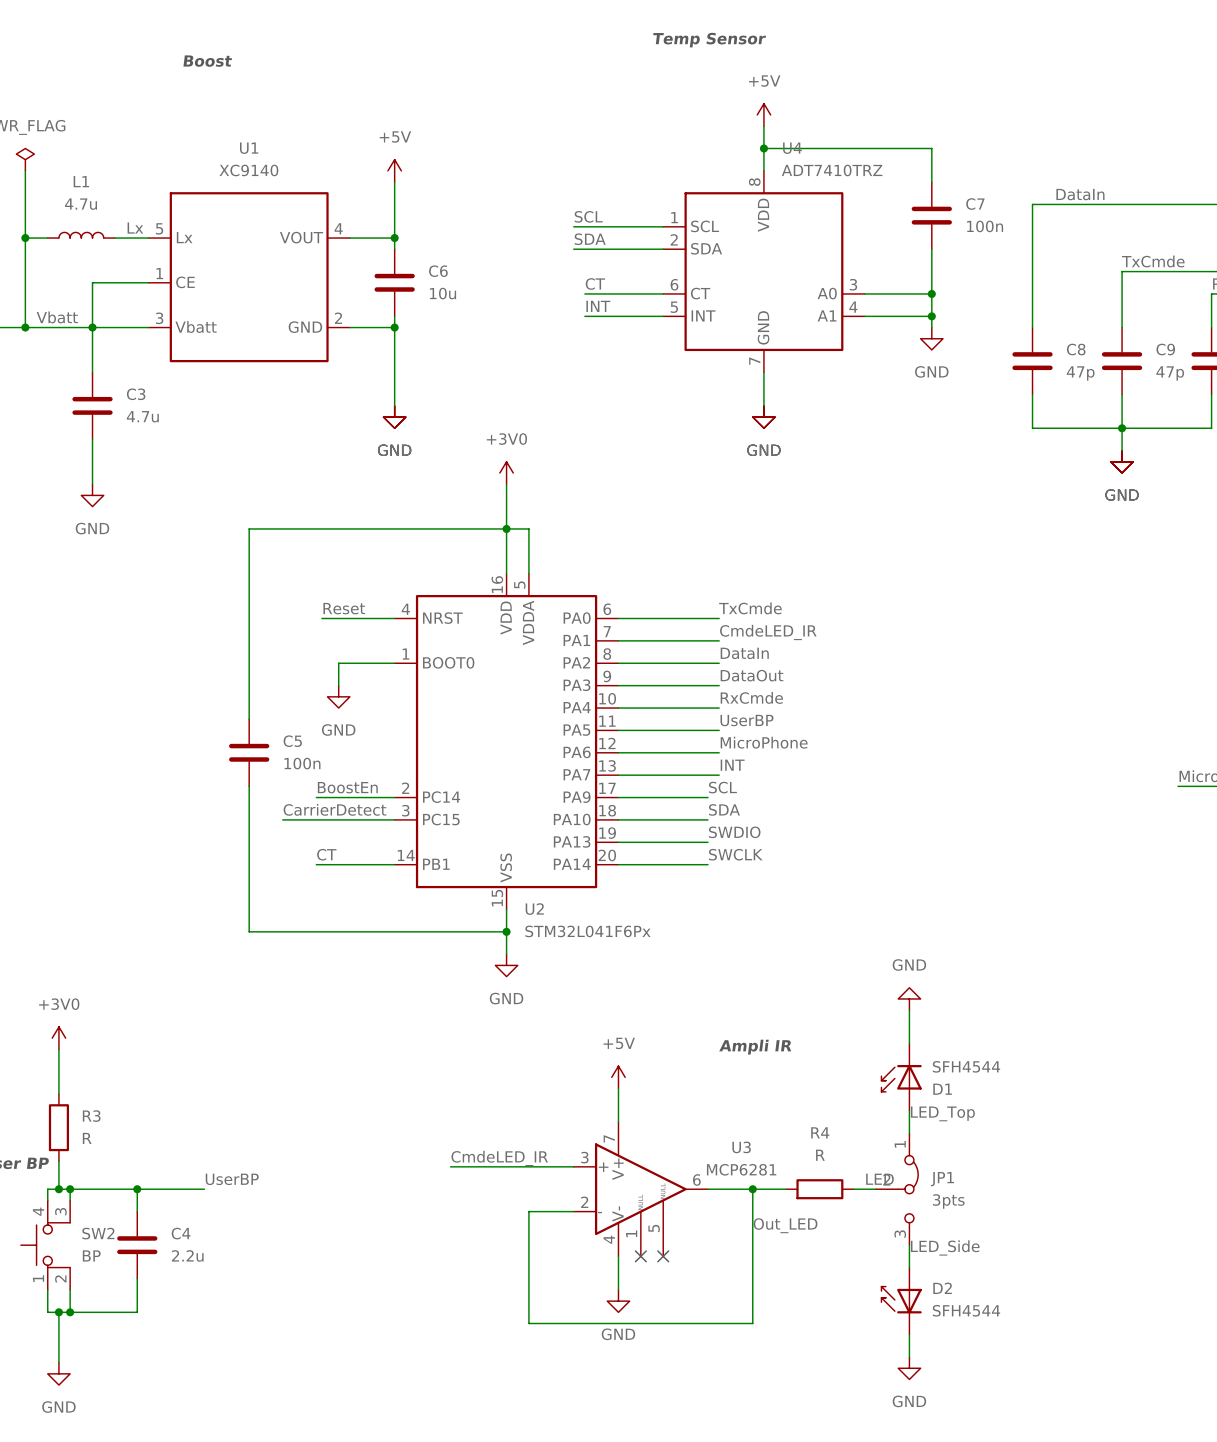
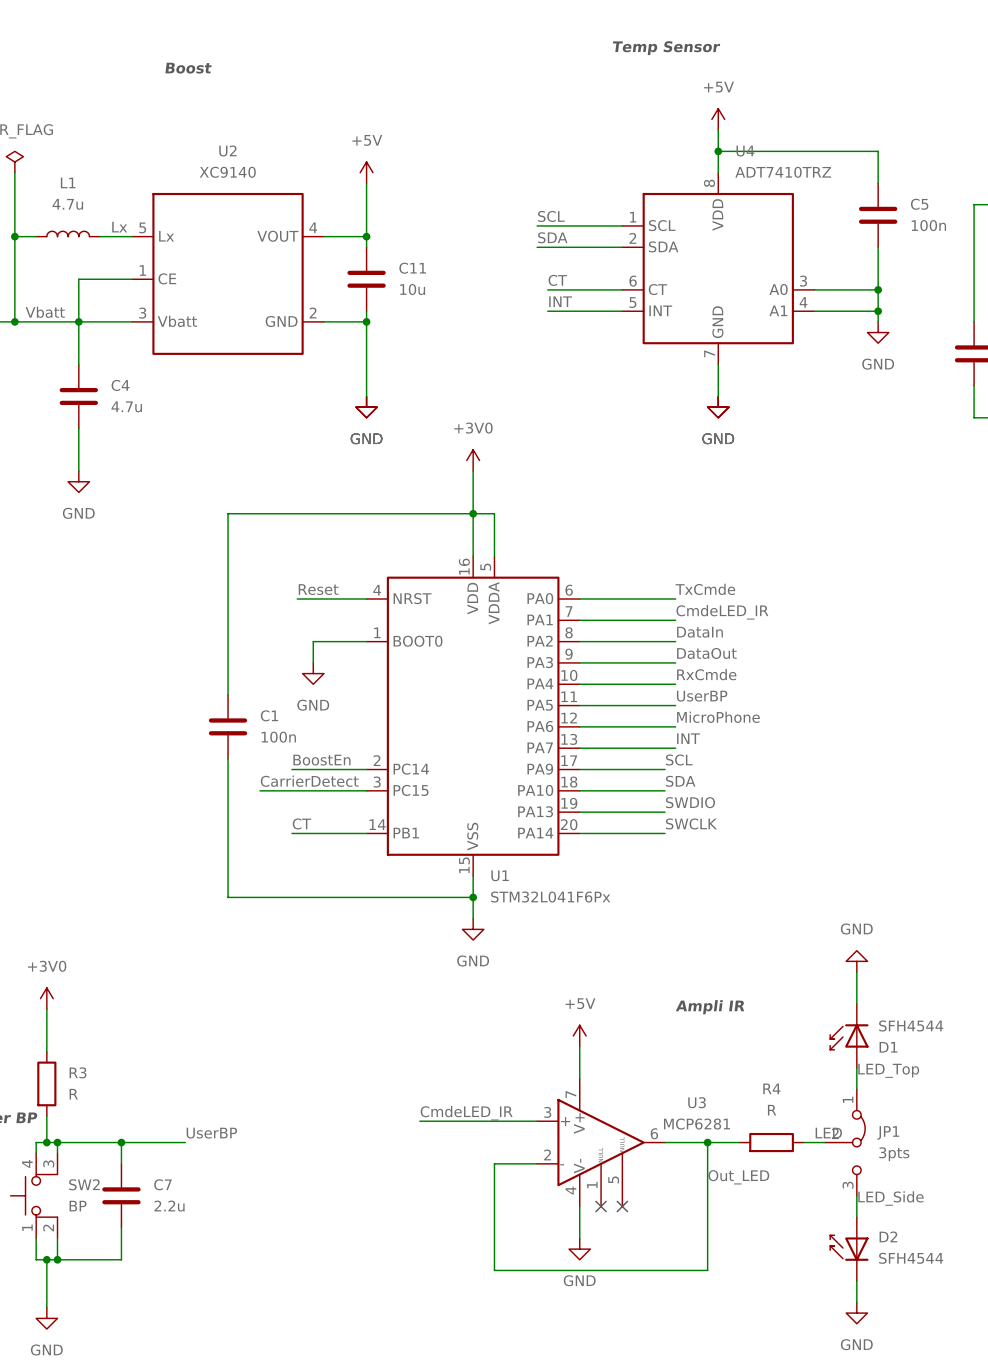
U1 name: U1 (249, 148) -> U2 (227, 150)
C7 name: C7 (975, 204) -> C5 (919, 204)
C6 name: C6 (438, 271) -> C11 (412, 268)
C3 name: C3 (136, 394) -> C4 (120, 385)
C5 name: C5 (292, 741) -> C1 (269, 715)
U2 name: U2 (534, 909) -> U1 (500, 875)
C4 name: C4 (181, 1233) -> C7 (162, 1184)

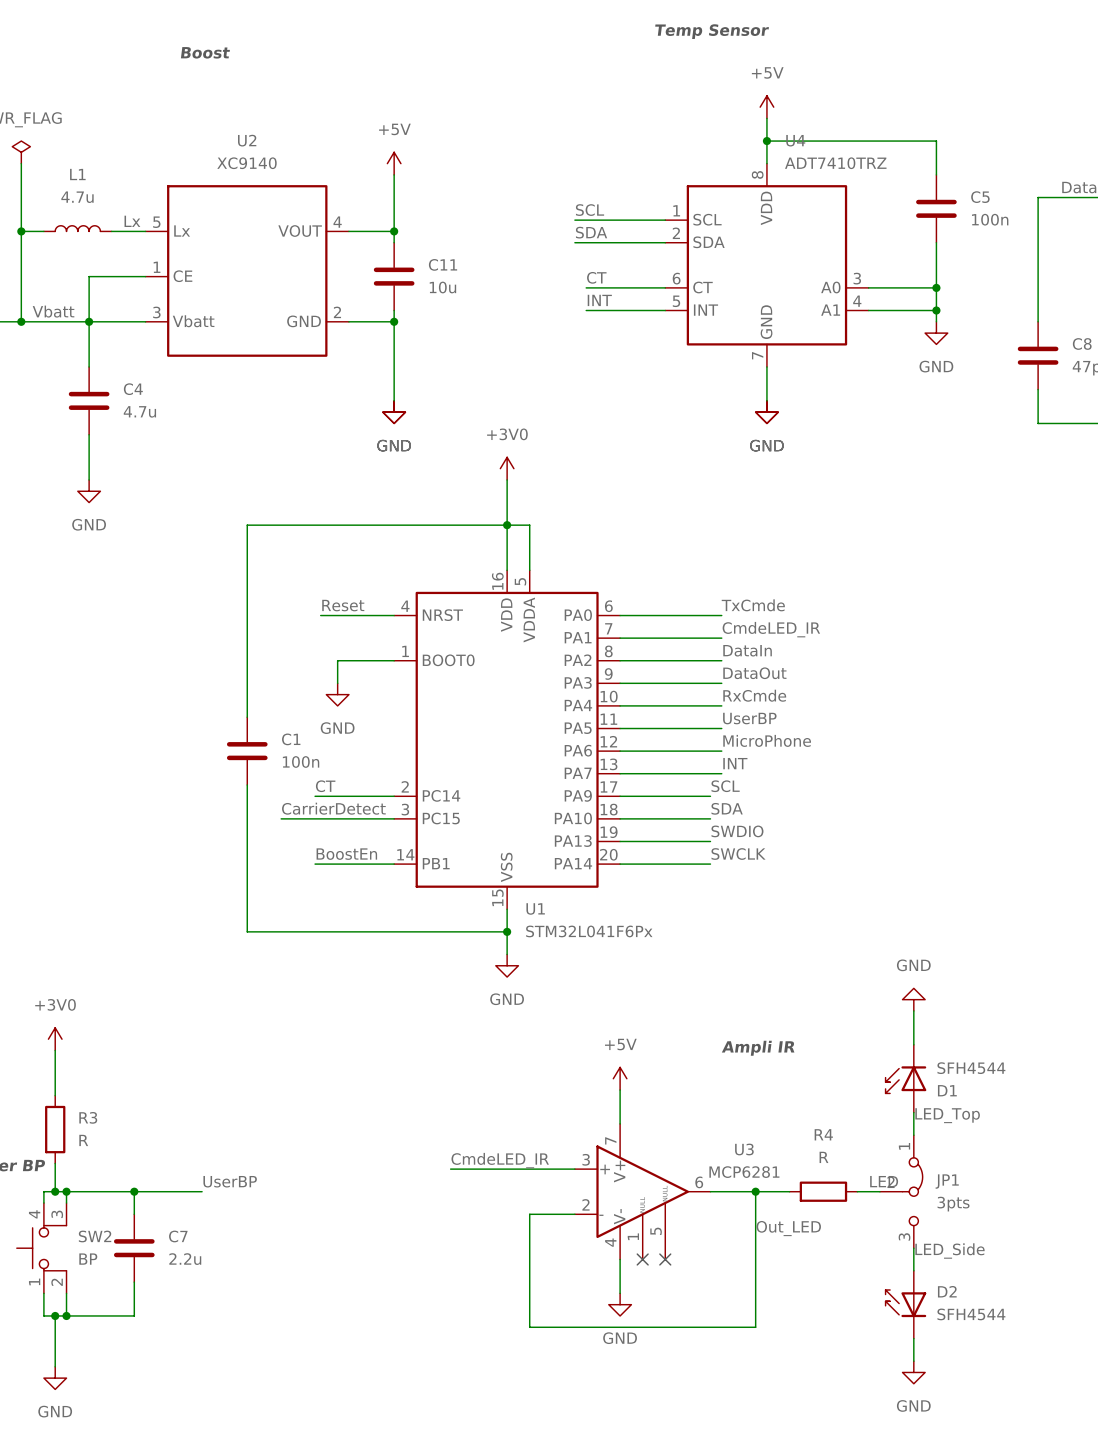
label: BoostEn (321, 760) -> CT (325, 786)
label: CT (301, 823) -> BoostEn (346, 854)

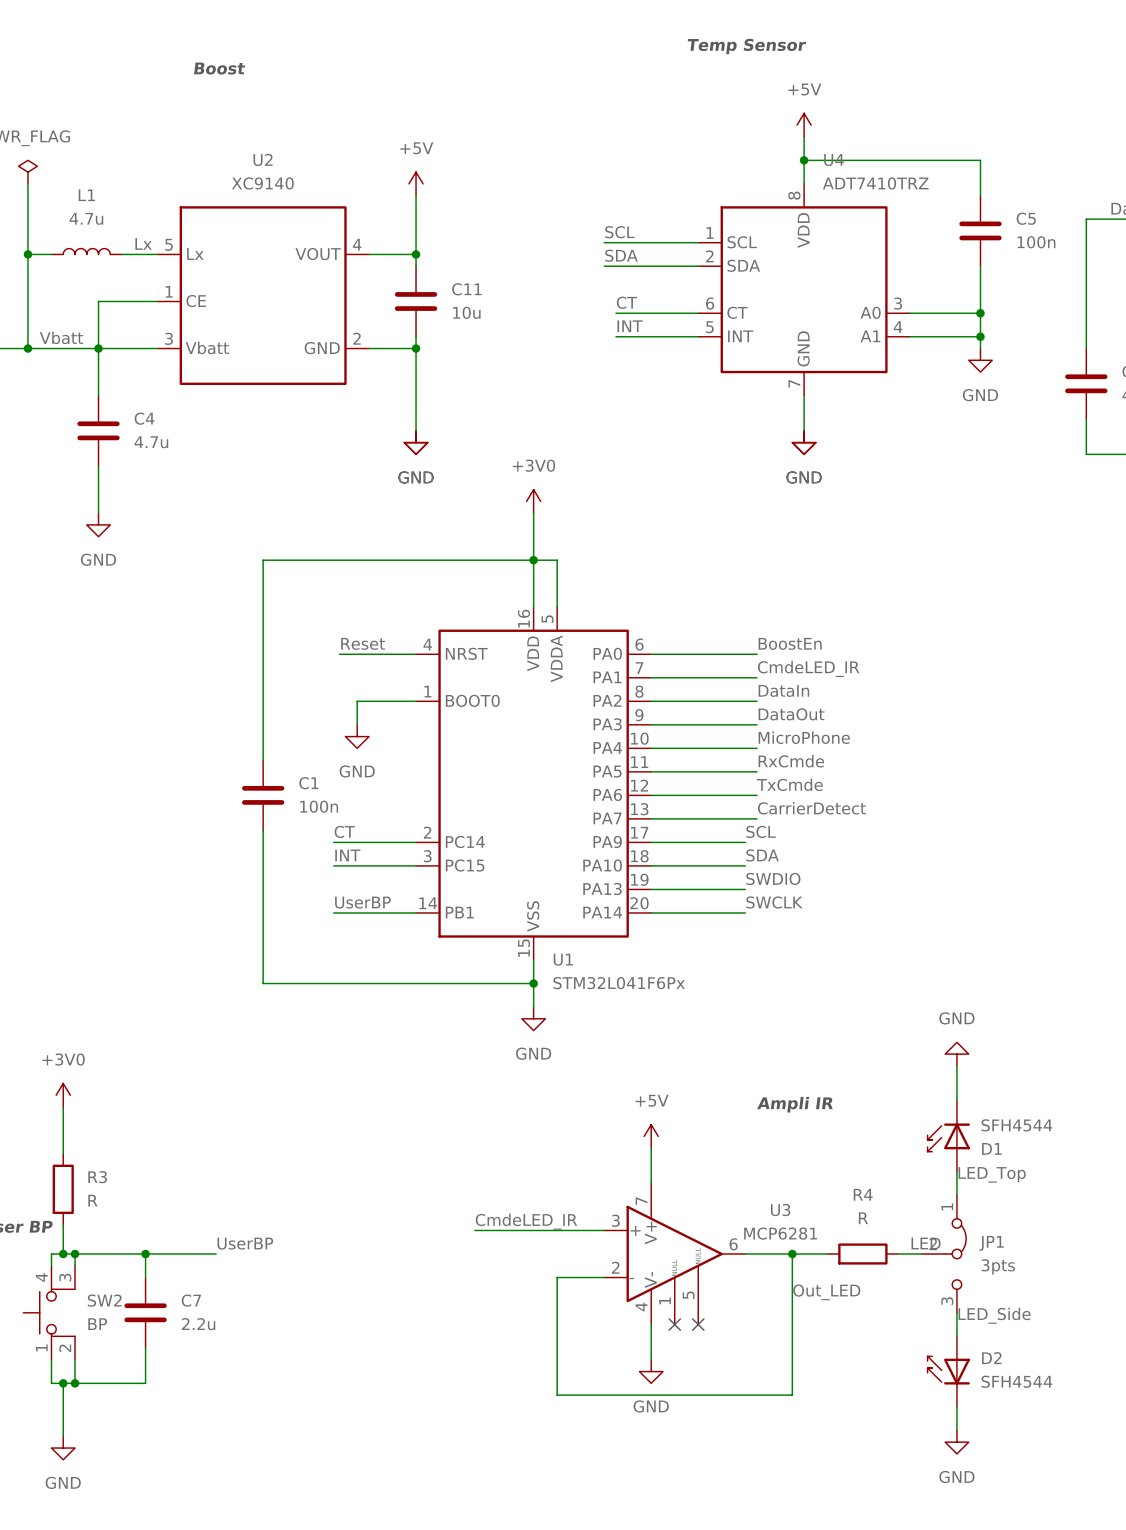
label: TxCmde (753, 605) -> BoostEn (790, 643)
label: RxCmde (754, 695) -> MicroPhone (804, 737)
label: UserBP (749, 718) -> RxCmde (791, 761)
label: MicroPhone (767, 740) -> TxCmde (789, 784)
label: INT (735, 763) -> CarrierDetect (811, 808)
label: none -> INT (347, 855)
label: CarrierDetect (333, 808) -> none
wire: (281, 818) (315, 818) -> none
label: BoostEn (346, 854) -> UserBP (362, 902)

